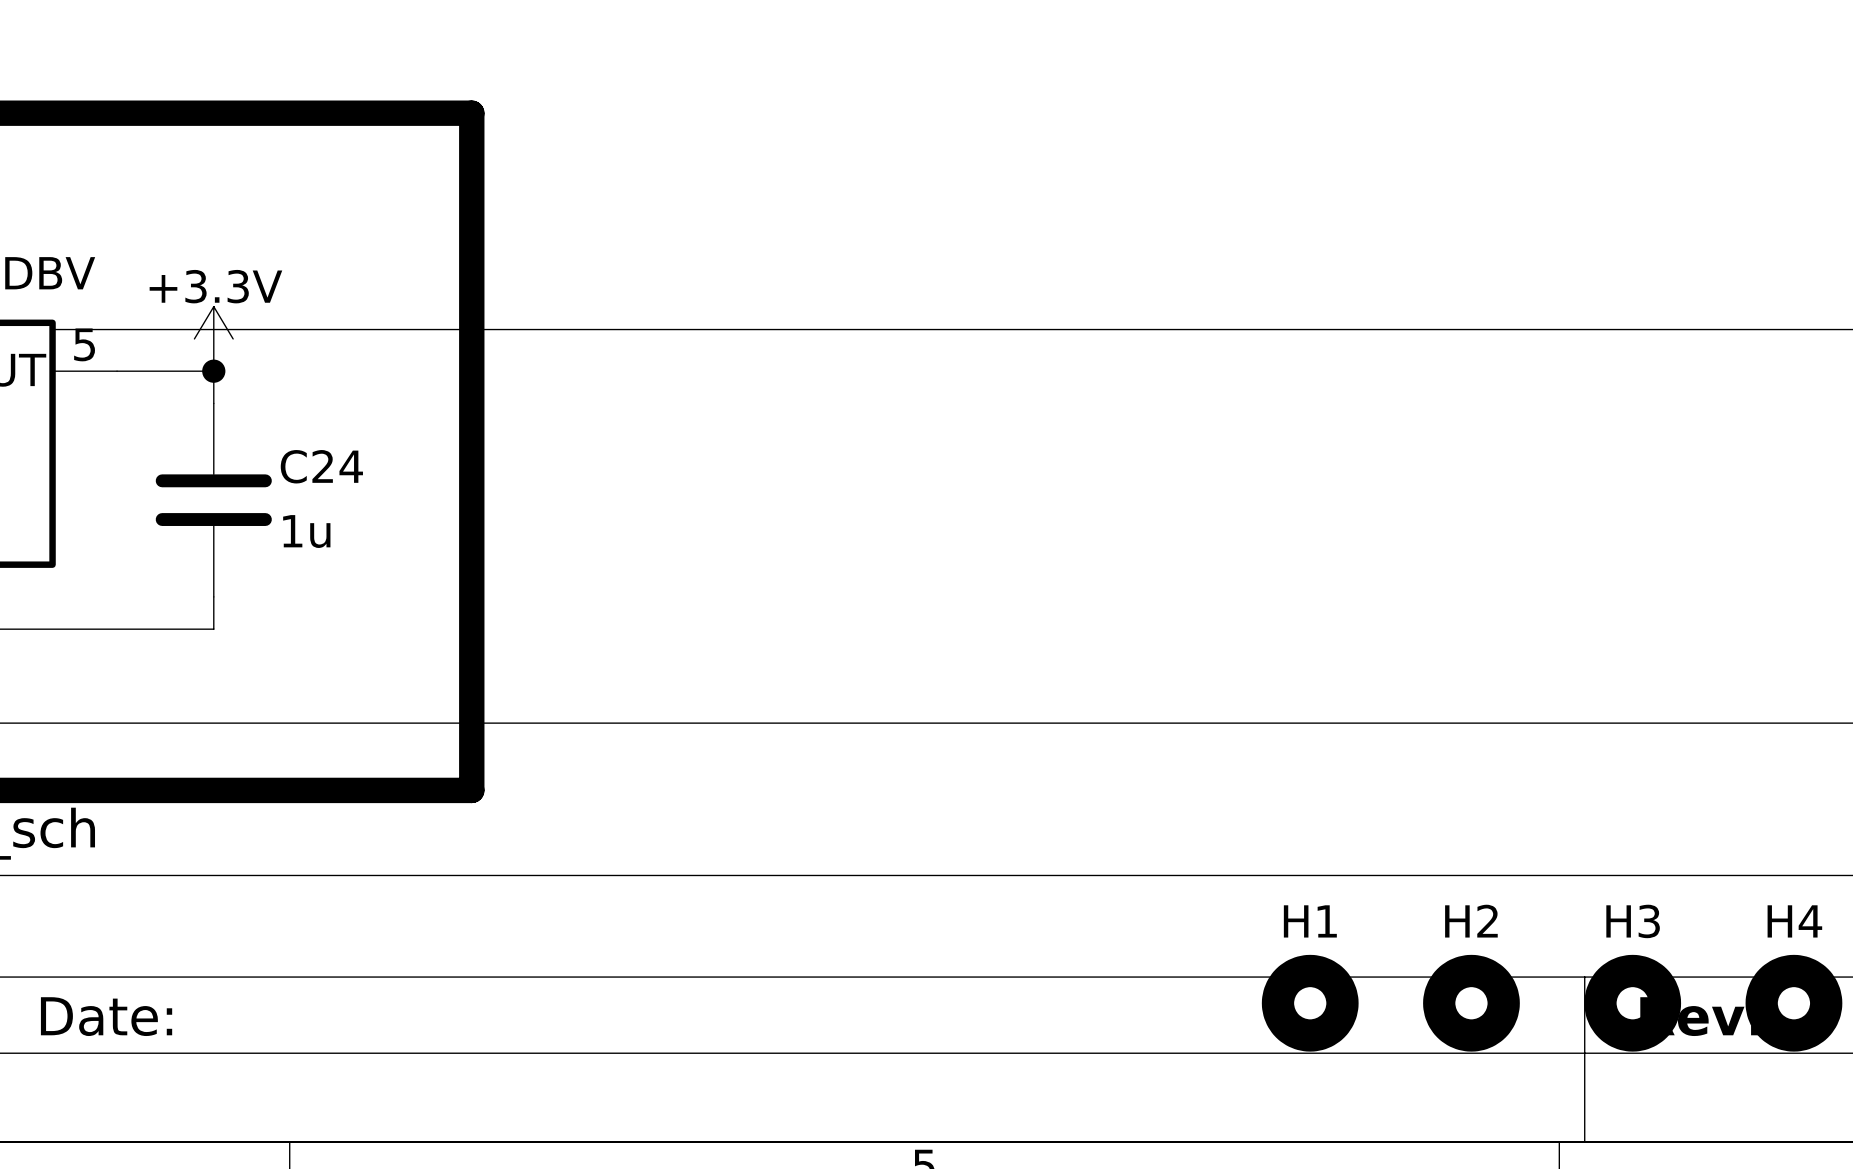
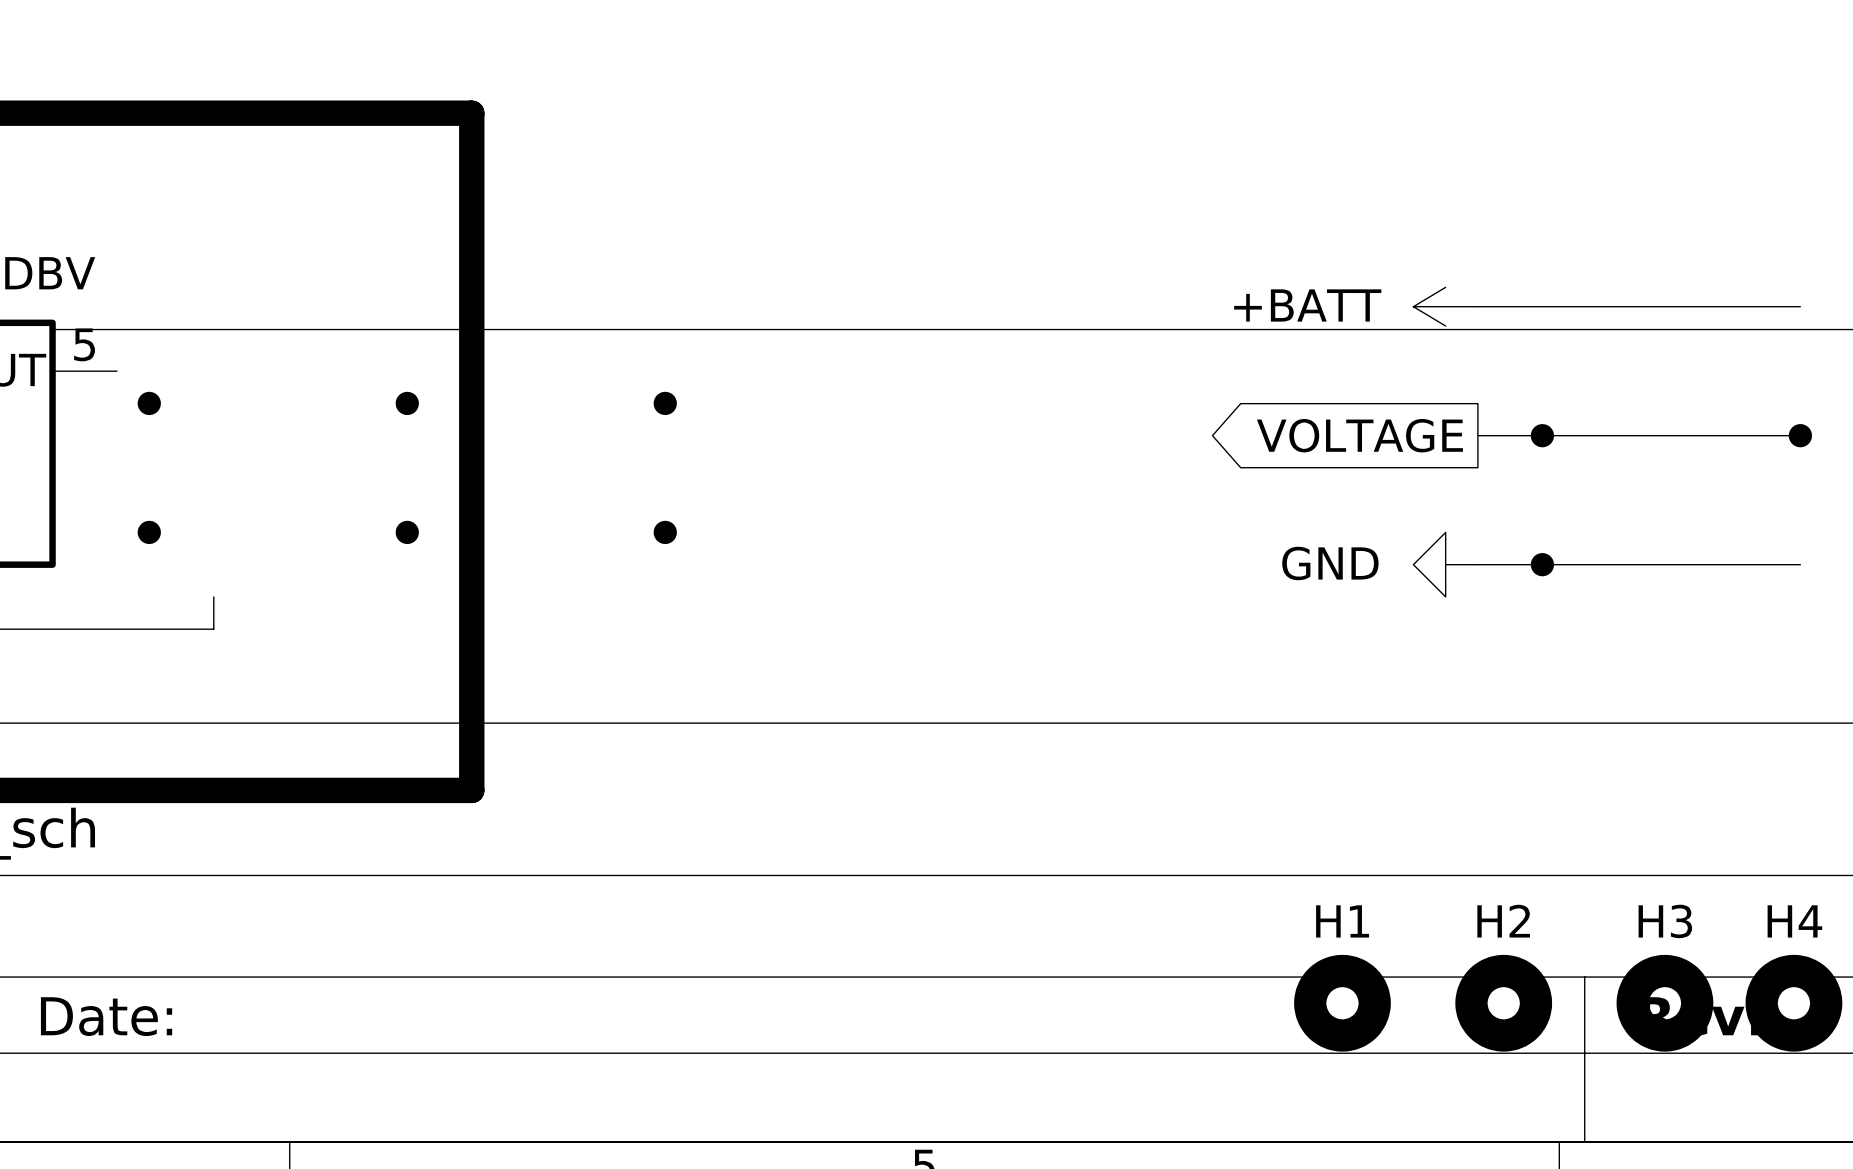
power symbol: none -> +BATT (1445, 306)
wire: none -> (1477, 306) (1800, 306)
power symbol: +3.3V (213, 338) -> none
wire: (117, 371) (213, 371) (213, 403) -> none
junction position: (213, 371) -> (149, 403)
junction: none -> (407, 403)
junction: none -> (665, 403)
global label: none -> VOLTAGE (1359, 435)
wire: none -> (1477, 435) (1800, 435)
junction: none -> (1542, 435)
junction: none -> (1800, 435)
C24: 1u (213, 500) -> none
junction: none -> (149, 532)
junction: none -> (407, 532)
junction: none -> (665, 532)
power symbol: none -> GND (1445, 564)
wire: none -> (1477, 564) (1800, 564)
junction: none -> (1542, 564)
H1 position: (1310, 1003) -> (1342, 1003)
H2 position: (1471, 1003) -> (1503, 1003)
H3 position: (1632, 1003) -> (1664, 1003)

